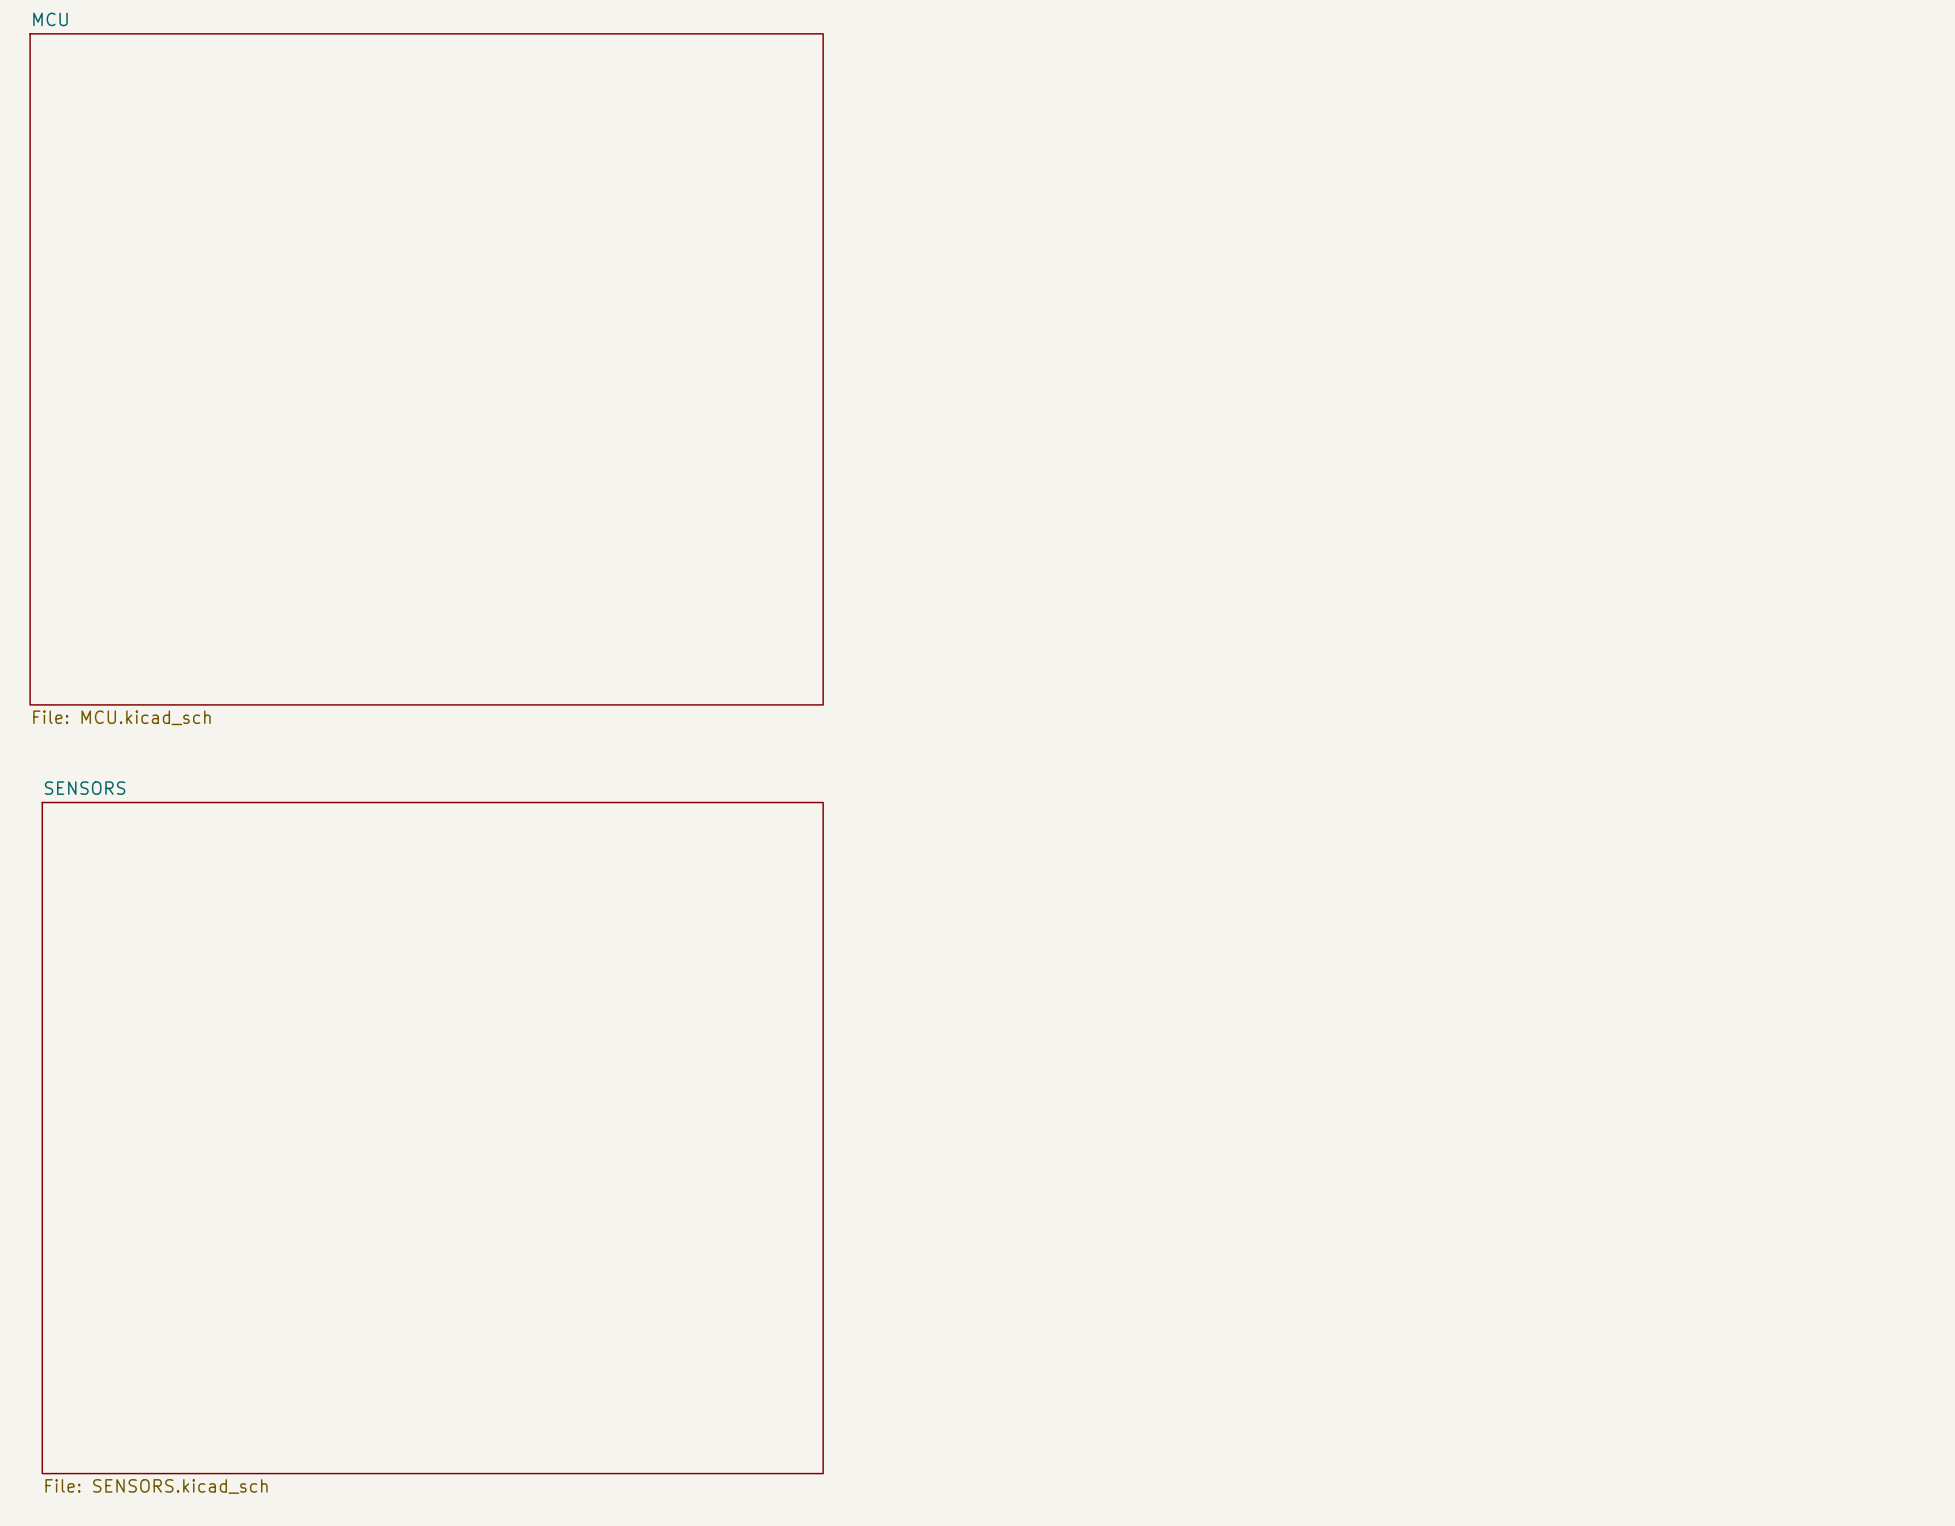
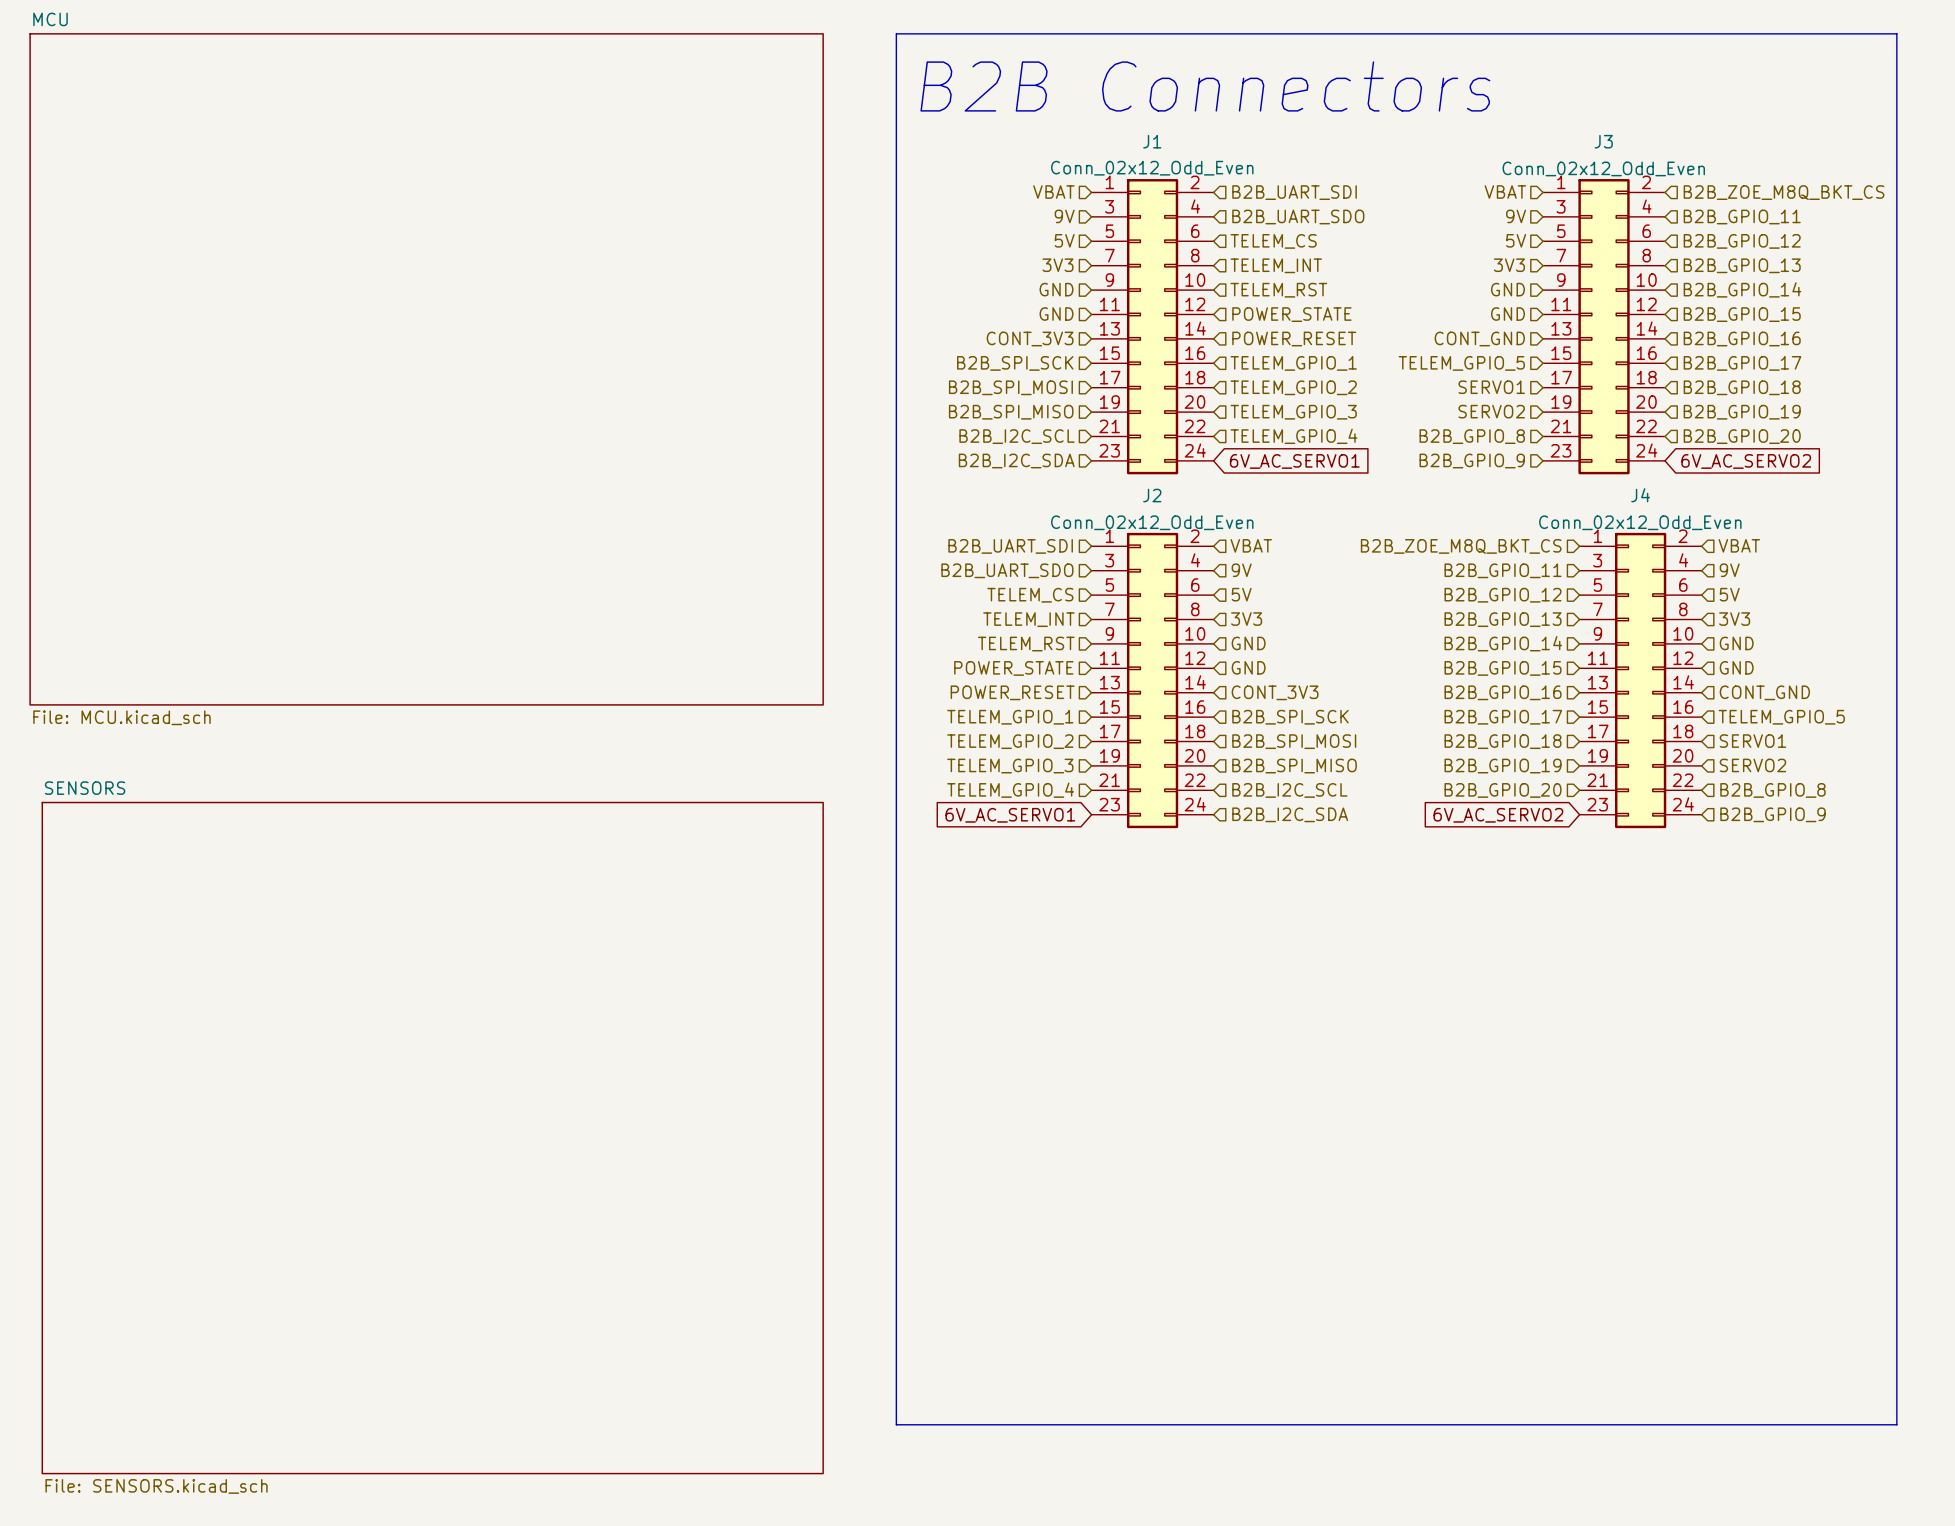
line: none -> (896, 33) (896, 1424) (1896, 1424) (1896, 33) (896, 33)
text: none -> B2B Connectors (1205, 86)
hierarchical label: none -> VBAT (1053, 192)
hierarchical label: none -> B2B_UART_SDI (1294, 192)
hierarchical label: none -> VBAT (1505, 192)
hierarchical label: none -> B2B_ZOE_M8Q_BKT_CS (1784, 192)
hierarchical label: none -> 9V (1064, 216)
hierarchical label: none -> B2B_UART_SDO (1298, 216)
hierarchical label: none -> 9V (1516, 216)
hierarchical label: none -> B2B_GPIO_11 (1742, 216)
hierarchical label: none -> 5V (1064, 240)
hierarchical label: none -> 5V (1516, 240)
hierarchical label: none -> TELEM_CS (1273, 241)
hierarchical label: none -> B2B_GPIO_12 (1742, 241)
hierarchical label: none -> 3V3 (1057, 265)
hierarchical label: none -> TELEM_INT (1276, 265)
hierarchical label: none -> 3V3 (1509, 265)
hierarchical label: none -> B2B_GPIO_13 (1742, 265)
hierarchical label: none -> GND (1056, 289)
hierarchical label: none -> GND (1507, 289)
hierarchical label: none -> B2B_GPIO_14 (1742, 289)
hierarchical label: none -> TELEM_RST (1278, 290)
hierarchical label: none -> GND (1056, 314)
hierarchical label: none -> POWER_STATE (1291, 314)
hierarchical label: none -> GND (1507, 314)
hierarchical label: none -> B2B_GPIO_15 (1742, 314)
J1: none -> Conn_02x12_Odd_Even (1152, 326)
J3: none -> Conn_02x12_Odd_Even (1604, 326)
hierarchical label: none -> CONT_3V3 (1030, 339)
hierarchical label: none -> POWER_RESET (1294, 339)
hierarchical label: none -> CONT_GND (1479, 339)
hierarchical label: none -> B2B_GPIO_16 (1742, 339)
hierarchical label: none -> B2B_SPI_SCK (1015, 363)
hierarchical label: none -> TELEM_GPIO_1 (1293, 363)
hierarchical label: none -> TELEM_GPIO_5 (1461, 363)
hierarchical label: none -> B2B_GPIO_17 (1742, 363)
hierarchical label: none -> B2B_SPI_MOSI (1010, 387)
hierarchical label: none -> TELEM_GPIO_2 (1293, 387)
hierarchical label: none -> SERVO1 (1491, 387)
hierarchical label: none -> B2B_GPIO_18 (1742, 387)
hierarchical label: none -> SERVO2 (1491, 411)
hierarchical label: none -> B2B_SPI_MISO (1011, 412)
hierarchical label: none -> TELEM_GPIO_3 (1293, 412)
hierarchical label: none -> B2B_GPIO_19 (1742, 412)
hierarchical label: none -> B2B_I2C_SCL (1017, 436)
hierarchical label: none -> TELEM_GPIO_4 (1293, 436)
hierarchical label: none -> B2B_GPIO_8 (1472, 436)
hierarchical label: none -> B2B_GPIO_20 (1742, 436)
hierarchical label: none -> B2B_I2C_SDA (1016, 461)
global label: none -> 6V_AC_SERVO1 (1294, 461)
hierarchical label: none -> B2B_GPIO_9 (1472, 461)
global label: none -> 6V_AC_SERVO2 (1746, 461)
hierarchical label: none -> VBAT (1251, 545)
hierarchical label: none -> VBAT (1739, 545)
hierarchical label: none -> B2B_UART_SDI (1010, 546)
hierarchical label: none -> B2B_ZOE_M8Q_BKT_CS (1461, 546)
hierarchical label: none -> B2B_UART_SDO (1007, 570)
hierarchical label: none -> 9V (1241, 570)
hierarchical label: none -> B2B_GPIO_11 (1503, 570)
hierarchical label: none -> 9V (1729, 570)
hierarchical label: none -> 5V (1241, 594)
hierarchical label: none -> 5V (1729, 594)
hierarchical label: none -> TELEM_CS (1030, 595)
hierarchical label: none -> B2B_GPIO_12 (1503, 595)
hierarchical label: none -> TELEM_INT (1028, 619)
hierarchical label: none -> 3V3 (1246, 619)
hierarchical label: none -> B2B_GPIO_13 (1503, 619)
hierarchical label: none -> 3V3 (1734, 619)
hierarchical label: none -> GND (1248, 643)
hierarchical label: none -> B2B_GPIO_14 (1503, 643)
hierarchical label: none -> GND (1736, 643)
hierarchical label: none -> TELEM_RST (1026, 644)
hierarchical label: none -> GND (1248, 667)
hierarchical label: none -> GND (1736, 667)
hierarchical label: none -> POWER_STATE (1013, 668)
hierarchical label: none -> B2B_GPIO_15 (1503, 668)
J2: none -> Conn_02x12_Odd_Even (1152, 680)
J4: none -> Conn_02x12_Odd_Even (1640, 680)
hierarchical label: none -> POWER_RESET (1012, 692)
hierarchical label: none -> CONT_3V3 (1275, 692)
hierarchical label: none -> B2B_GPIO_16 (1503, 692)
hierarchical label: none -> CONT_GND (1764, 692)
hierarchical label: none -> TELEM_GPIO_1 (1010, 717)
hierarchical label: none -> B2B_SPI_SCK (1290, 717)
hierarchical label: none -> B2B_GPIO_17 (1503, 717)
hierarchical label: none -> TELEM_GPIO_5 (1781, 717)
hierarchical label: none -> TELEM_GPIO_2 (1010, 741)
hierarchical label: none -> B2B_SPI_MOSI (1294, 741)
hierarchical label: none -> B2B_GPIO_18 (1503, 741)
hierarchical label: none -> SERVO1 (1752, 741)
hierarchical label: none -> SERVO2 (1752, 765)
hierarchical label: none -> TELEM_GPIO_3 (1010, 766)
hierarchical label: none -> B2B_SPI_MISO (1294, 766)
hierarchical label: none -> B2B_GPIO_19 (1503, 766)
hierarchical label: none -> TELEM_GPIO_4 (1010, 790)
hierarchical label: none -> B2B_I2C_SCL (1289, 790)
hierarchical label: none -> B2B_GPIO_20 (1503, 790)
hierarchical label: none -> B2B_GPIO_8 (1772, 790)
hierarchical label: none -> B2B_I2C_SDA (1290, 814)
hierarchical label: none -> B2B_GPIO_9 (1772, 814)
global label: none -> 6V_AC_SERVO1 (1010, 815)
global label: none -> 6V_AC_SERVO2 (1498, 815)

